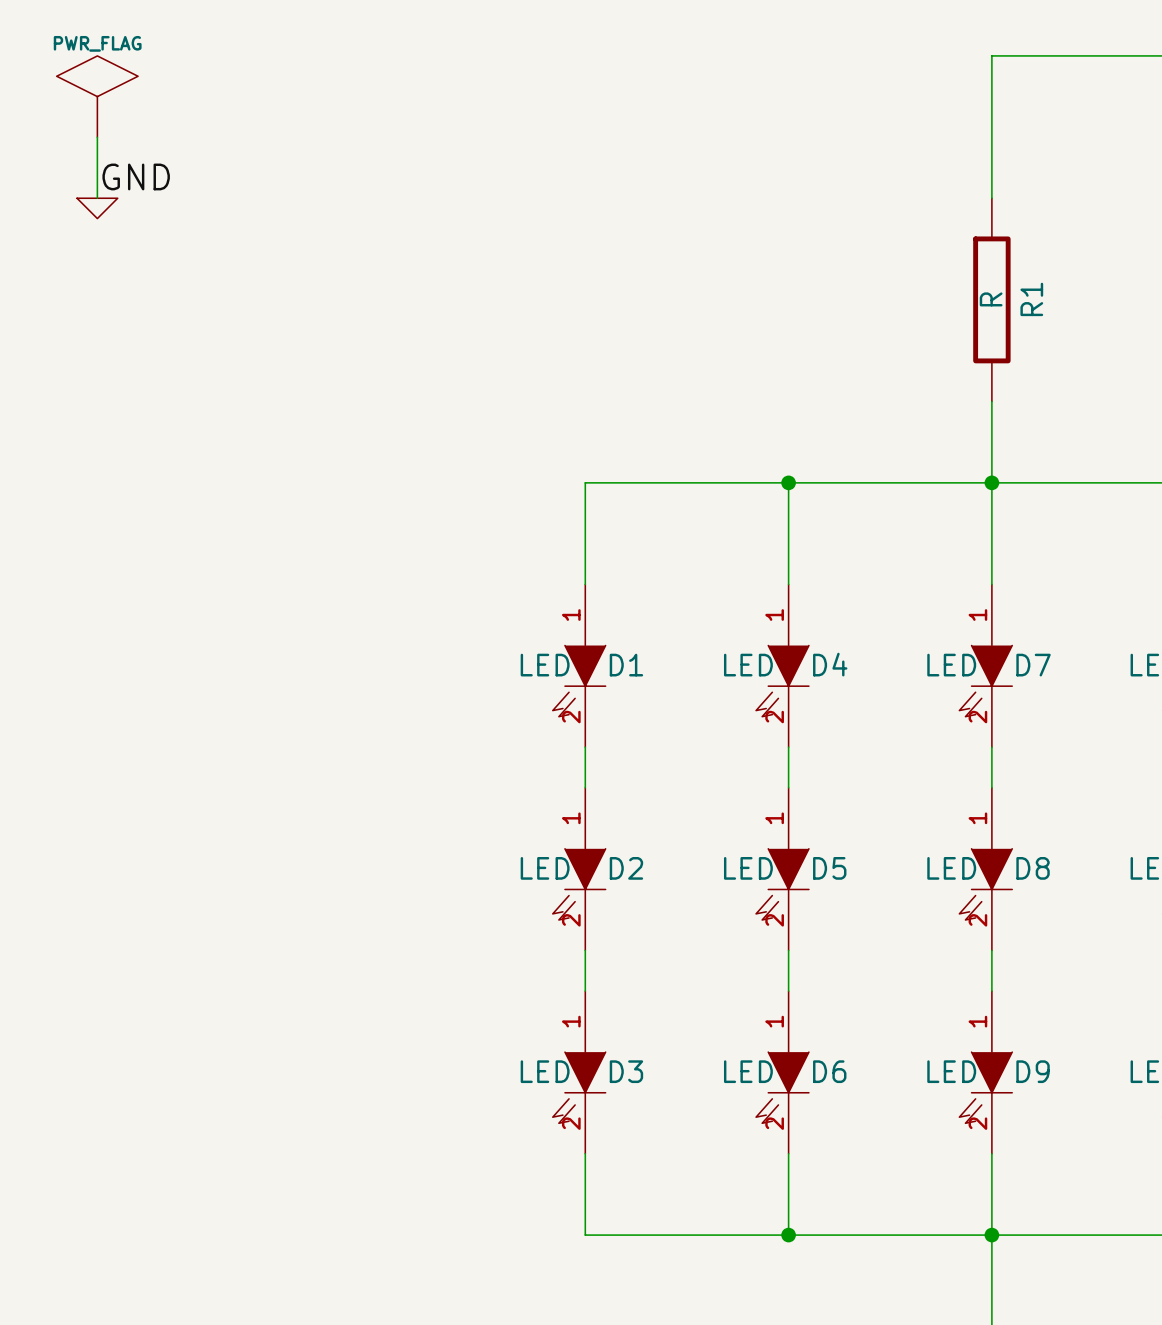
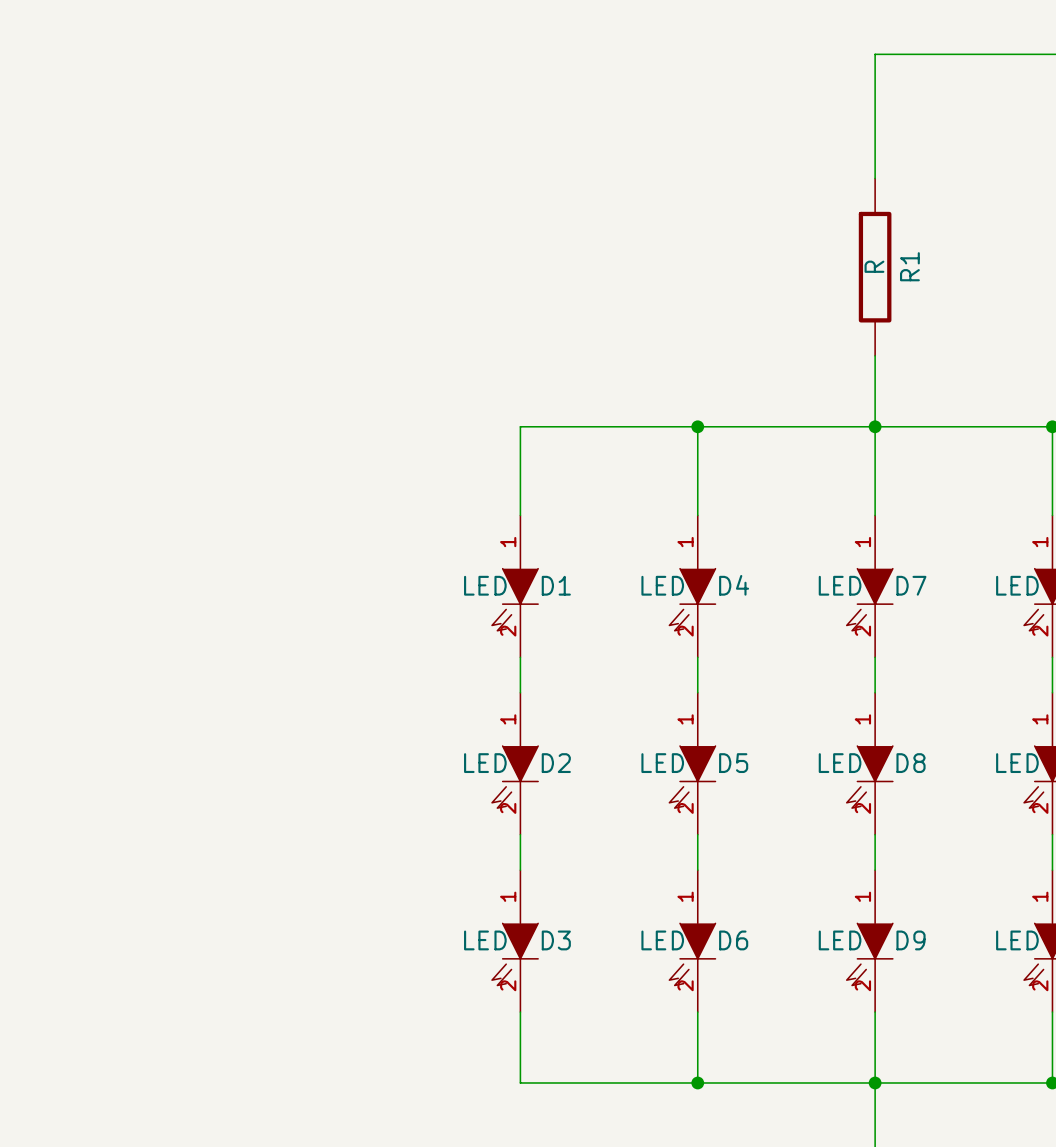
power symbol: PWR_FLAG (97, 96) -> none
wire: (97, 137) (97, 198) -> none
label: GND (136, 176) -> none
power symbol: (97, 208) -> none

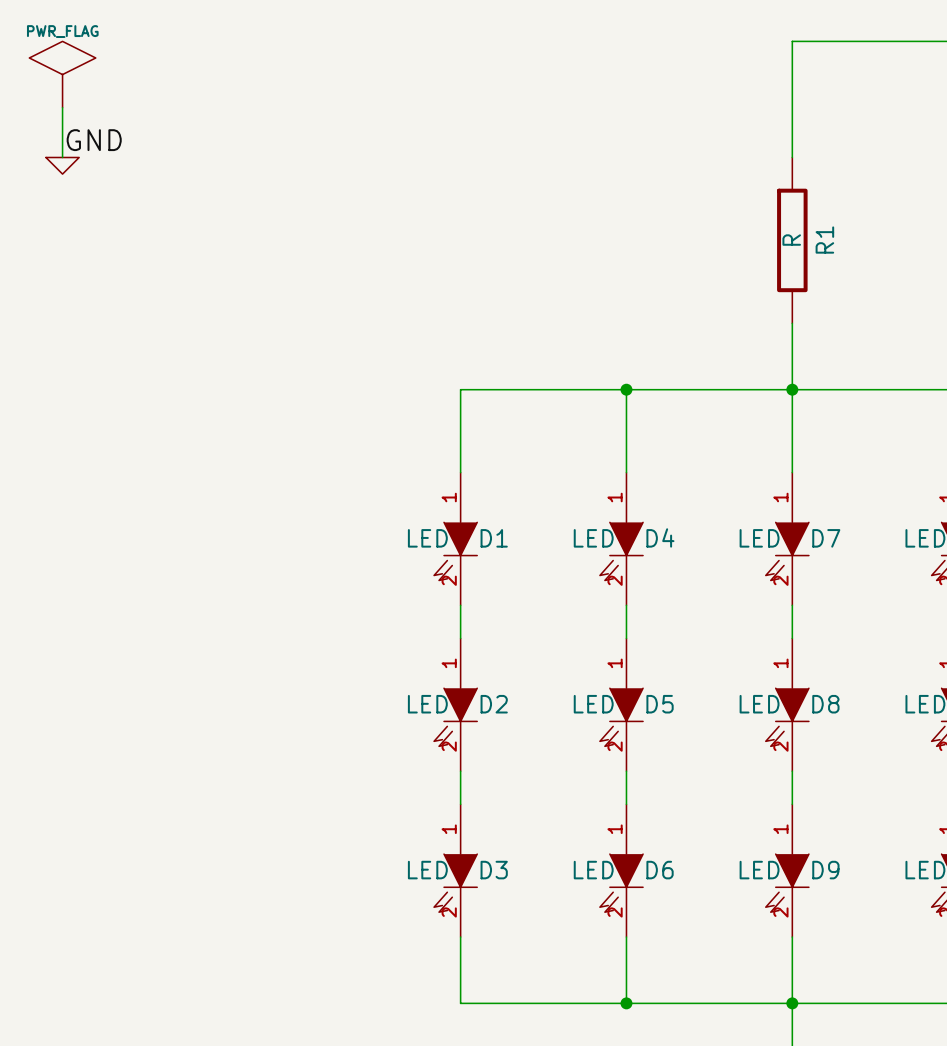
power symbol: none -> PWR_FLAG (62, 74)
wire: none -> (62, 107) (62, 157)
label: none -> GND (94, 140)
power symbol: none -> (62, 165)

